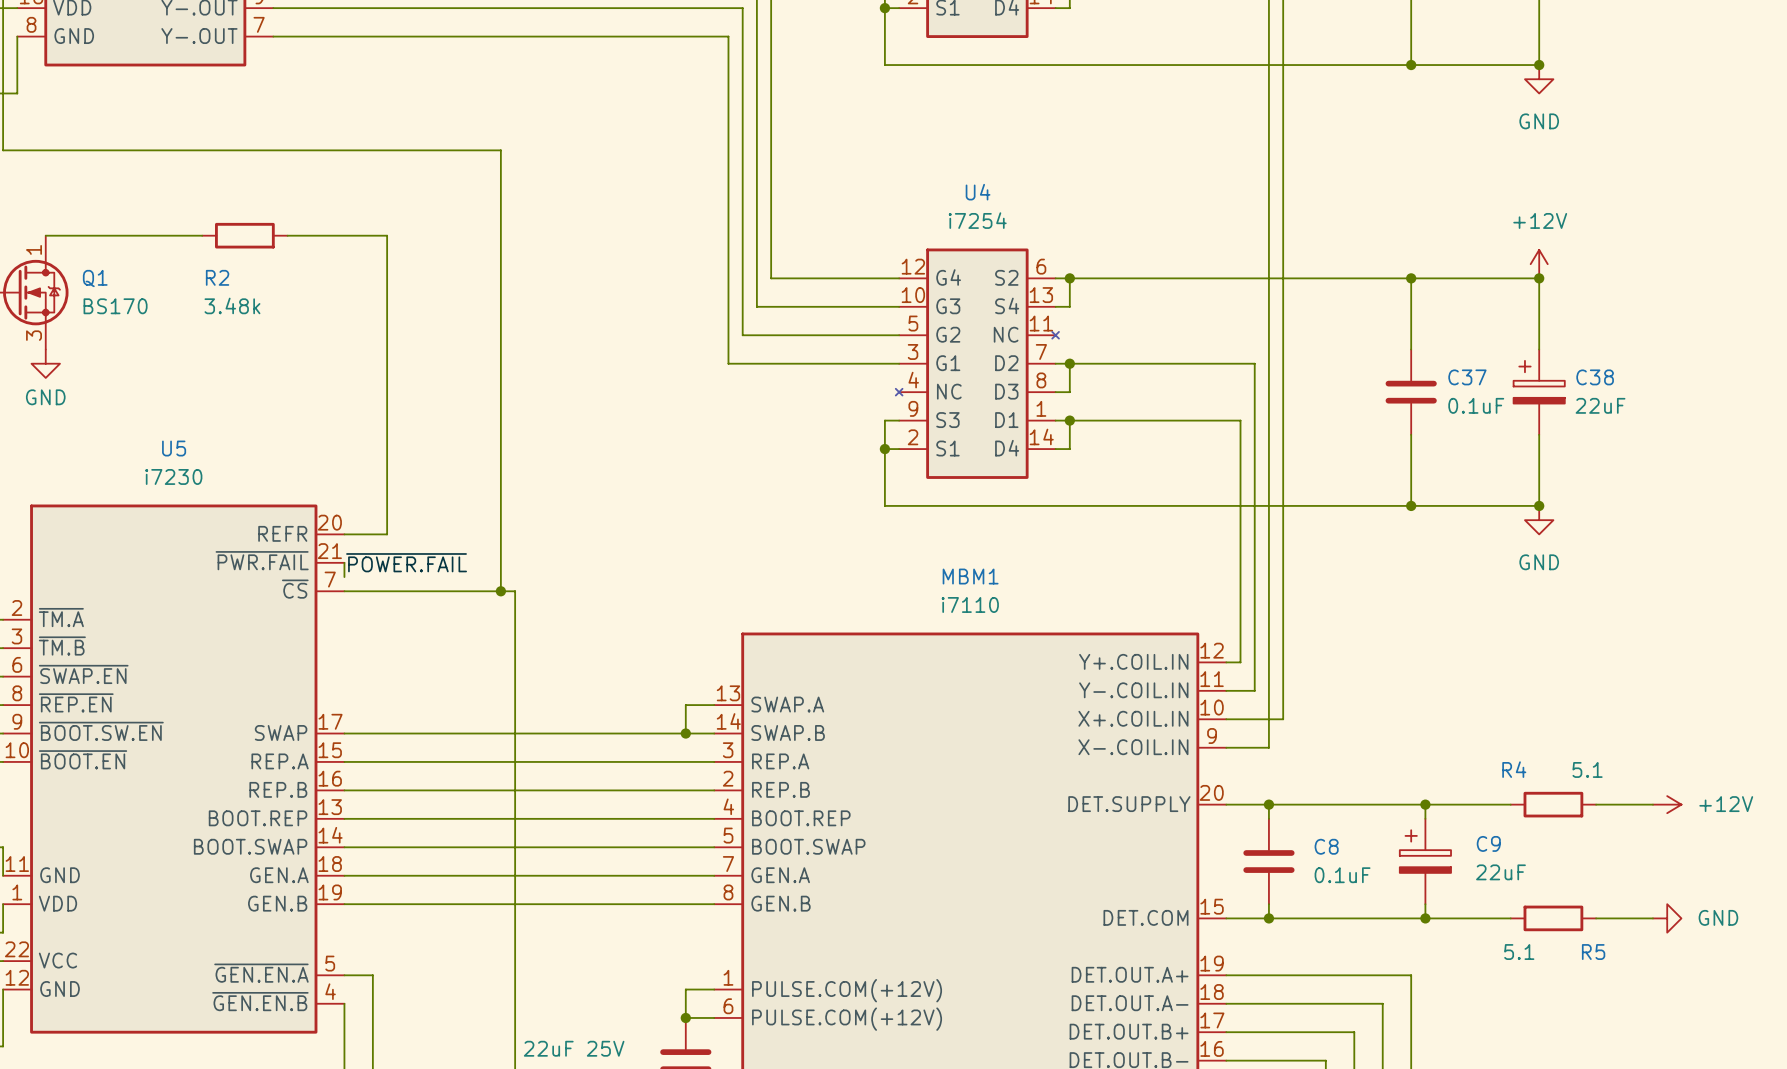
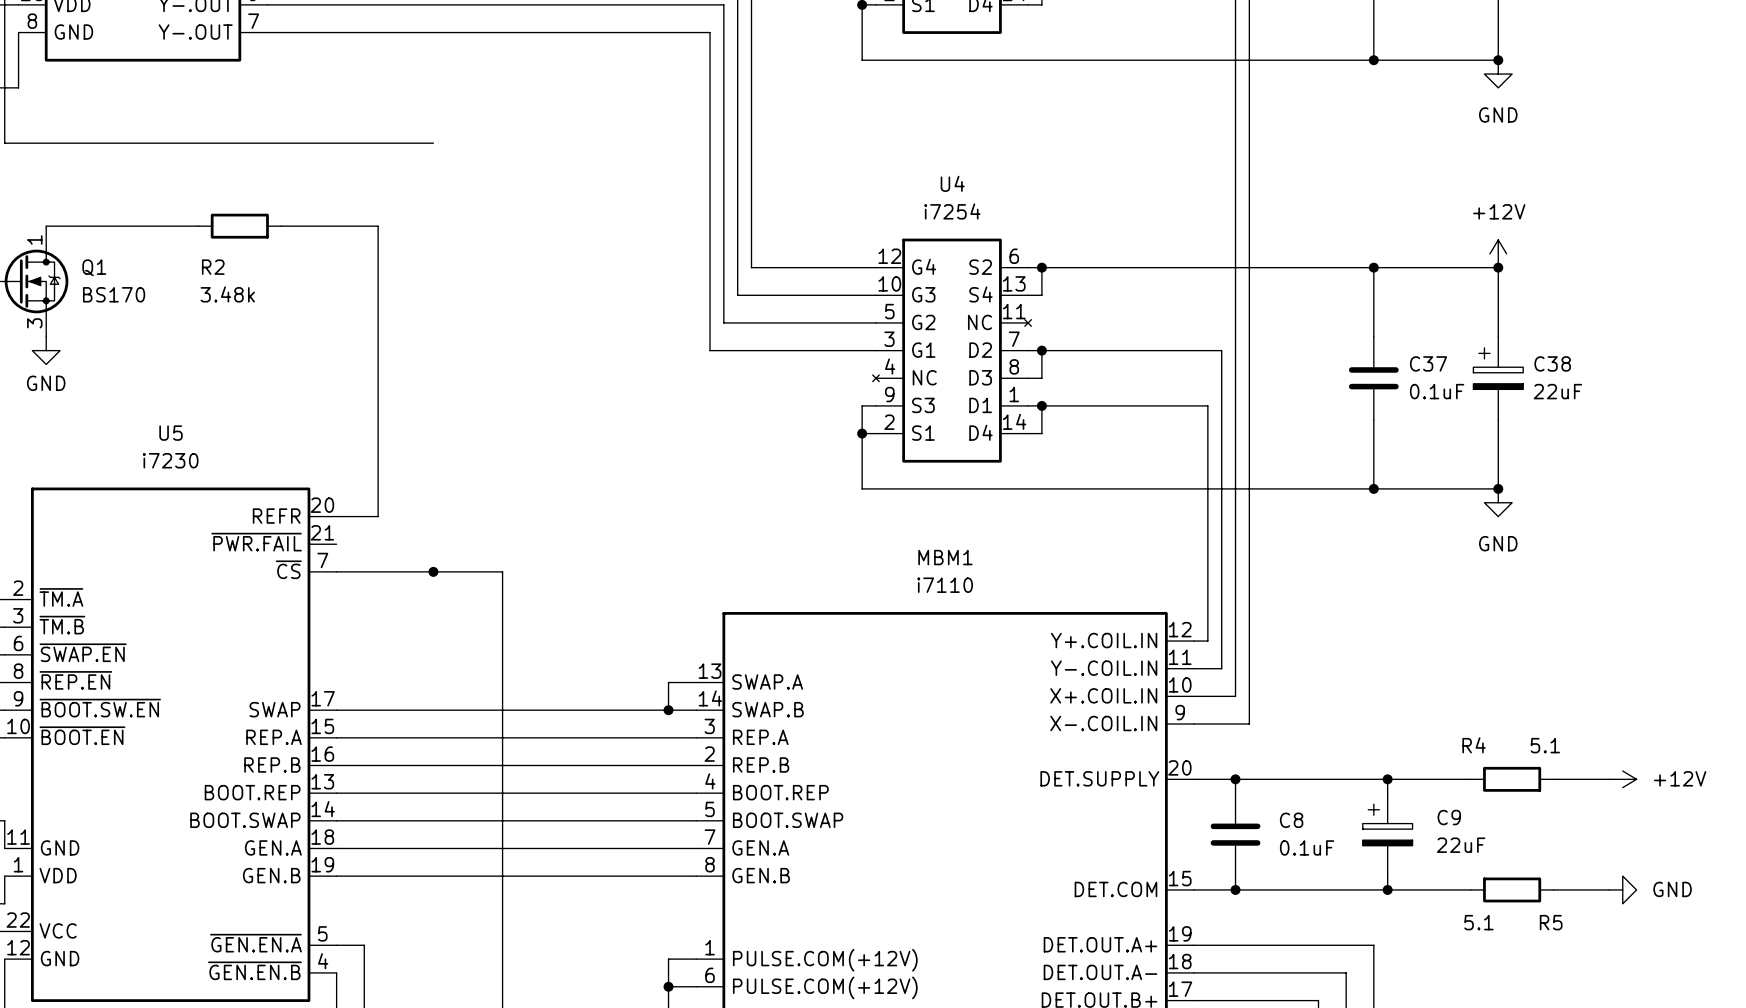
wire: (444, 150) (500, 150) (500, 591) -> none
wire: (344, 562) (344, 577) -> none
label: ~{POWER.FAIL} (406, 562) -> none
junction position: (500, 591) -> (433, 571)
wire: (1283, 719) (1268, 719) (1268, 747) -> (1249, 696) (1249, 724) (1235, 724)

